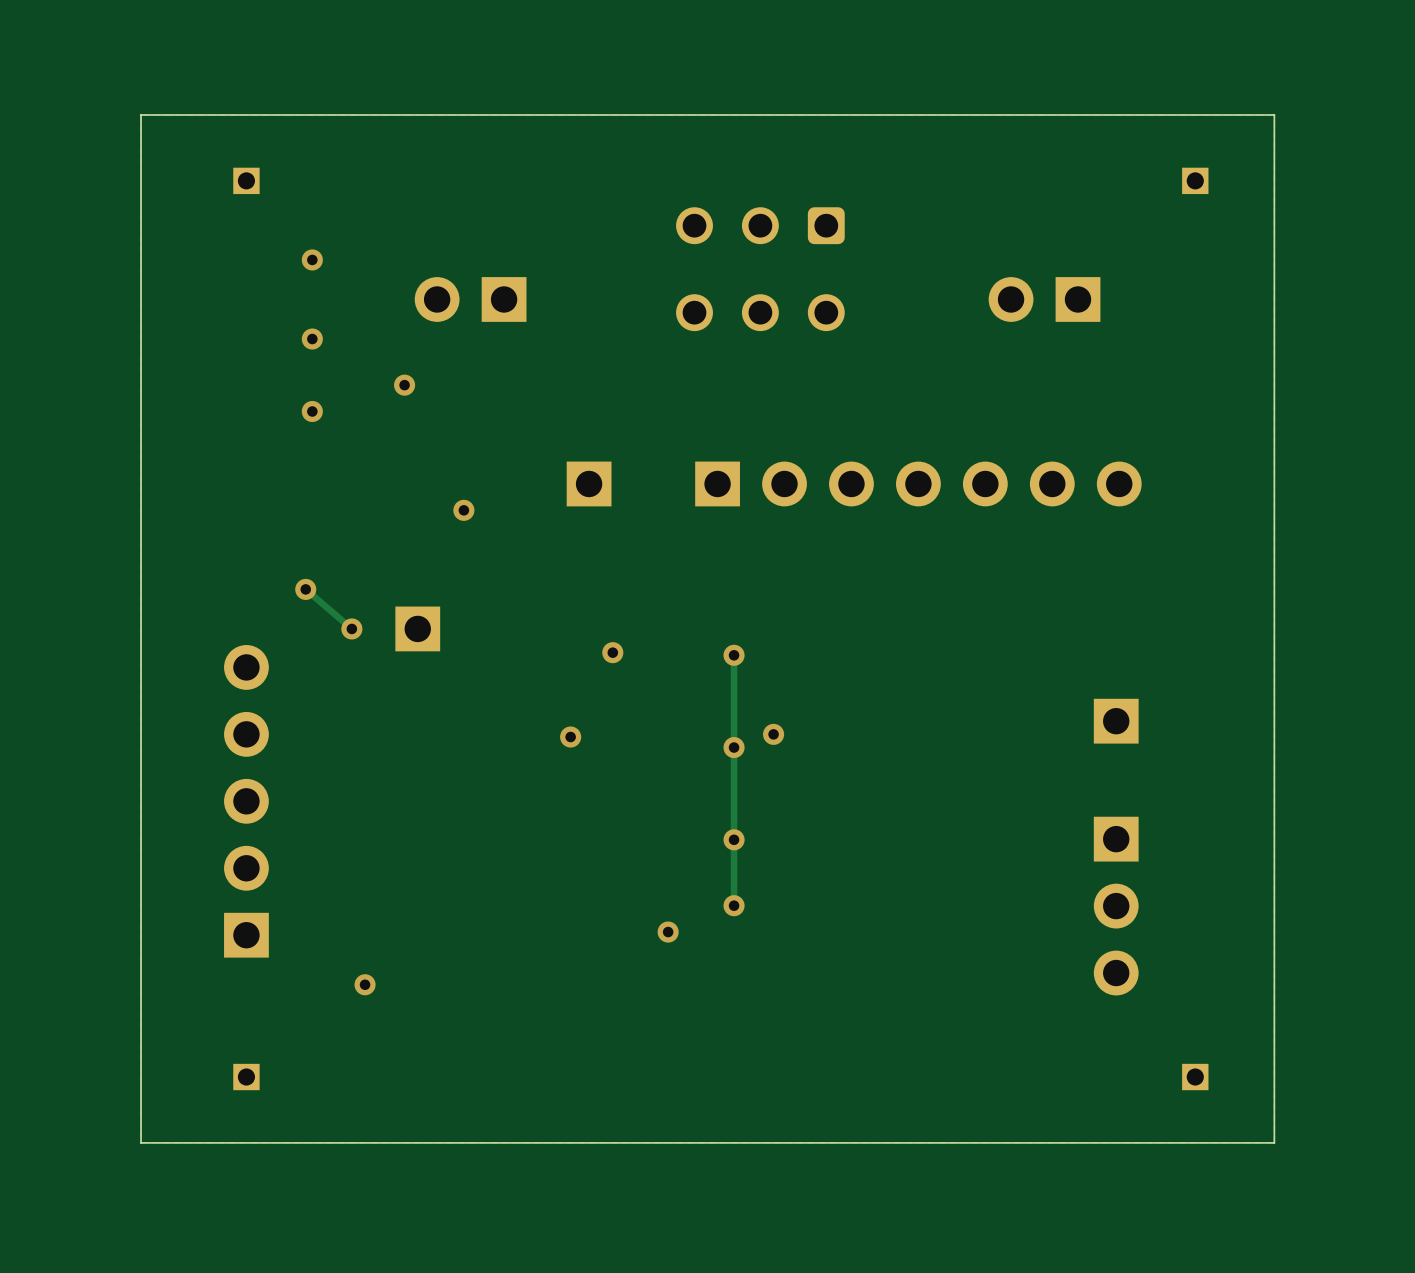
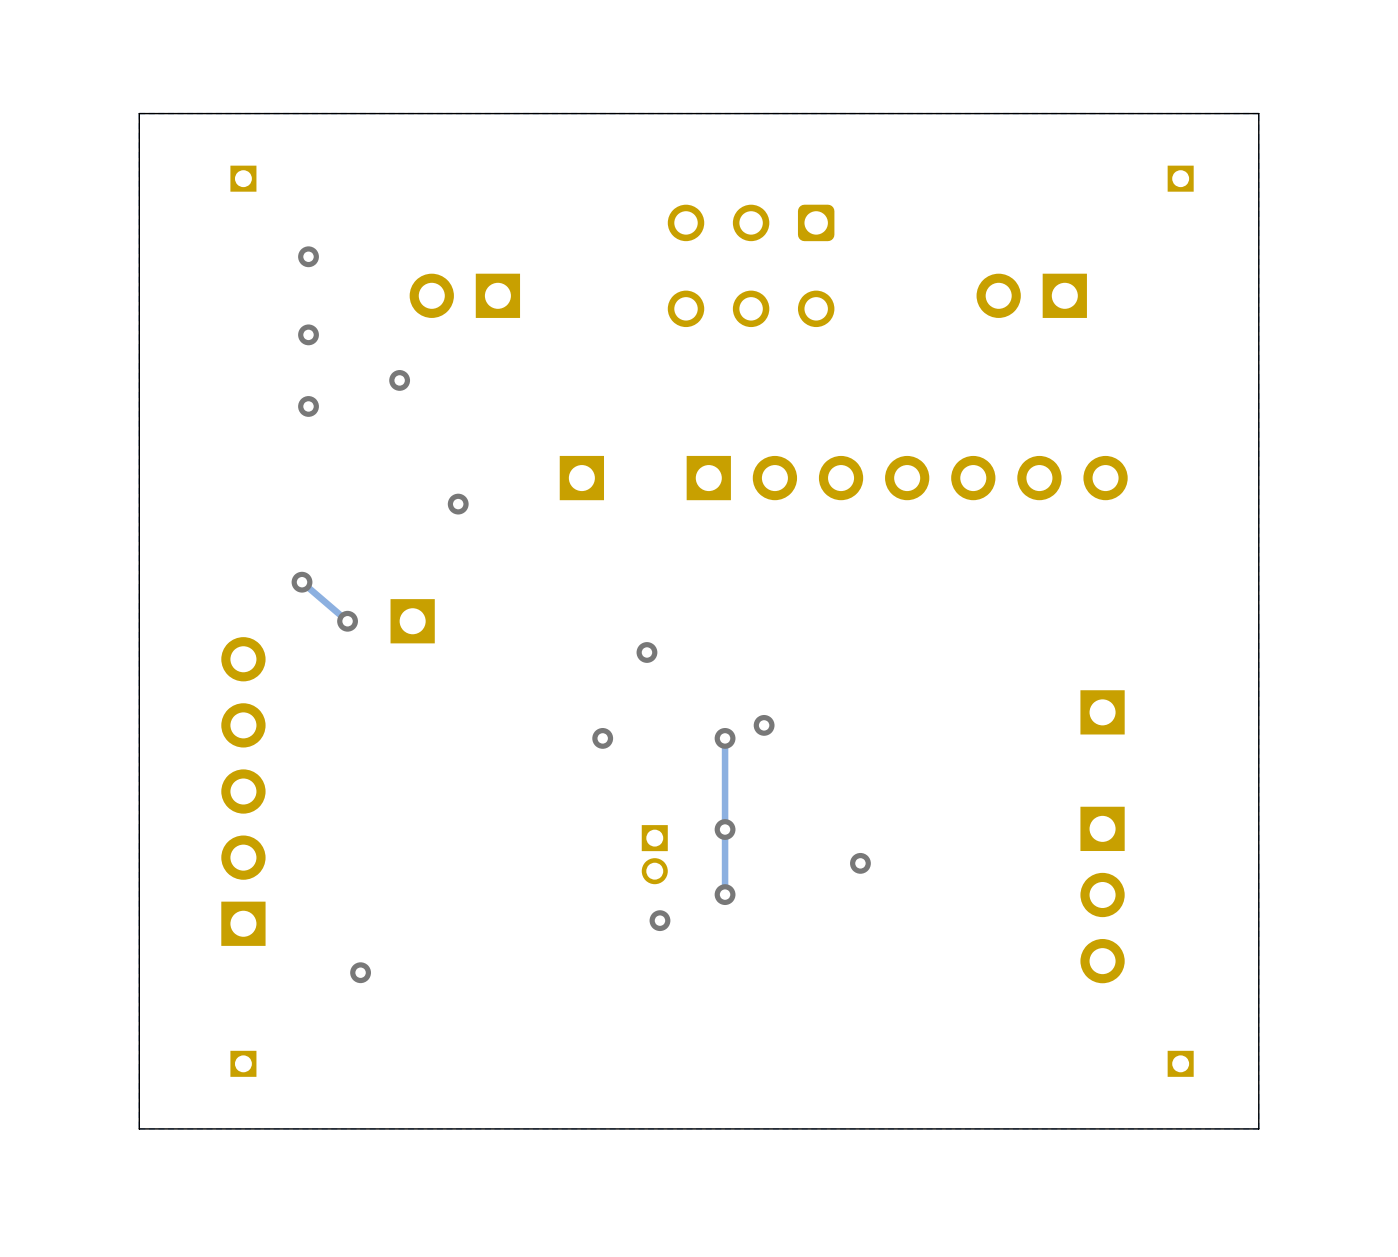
via: (612, 652) -> none
track: (734, 655) (734, 747) -> none
via: (734, 655) -> none
via: none -> (646, 652)
via position: (570, 737) -> (602, 738)
part: none -> (654, 854)
via: none -> (860, 863)

